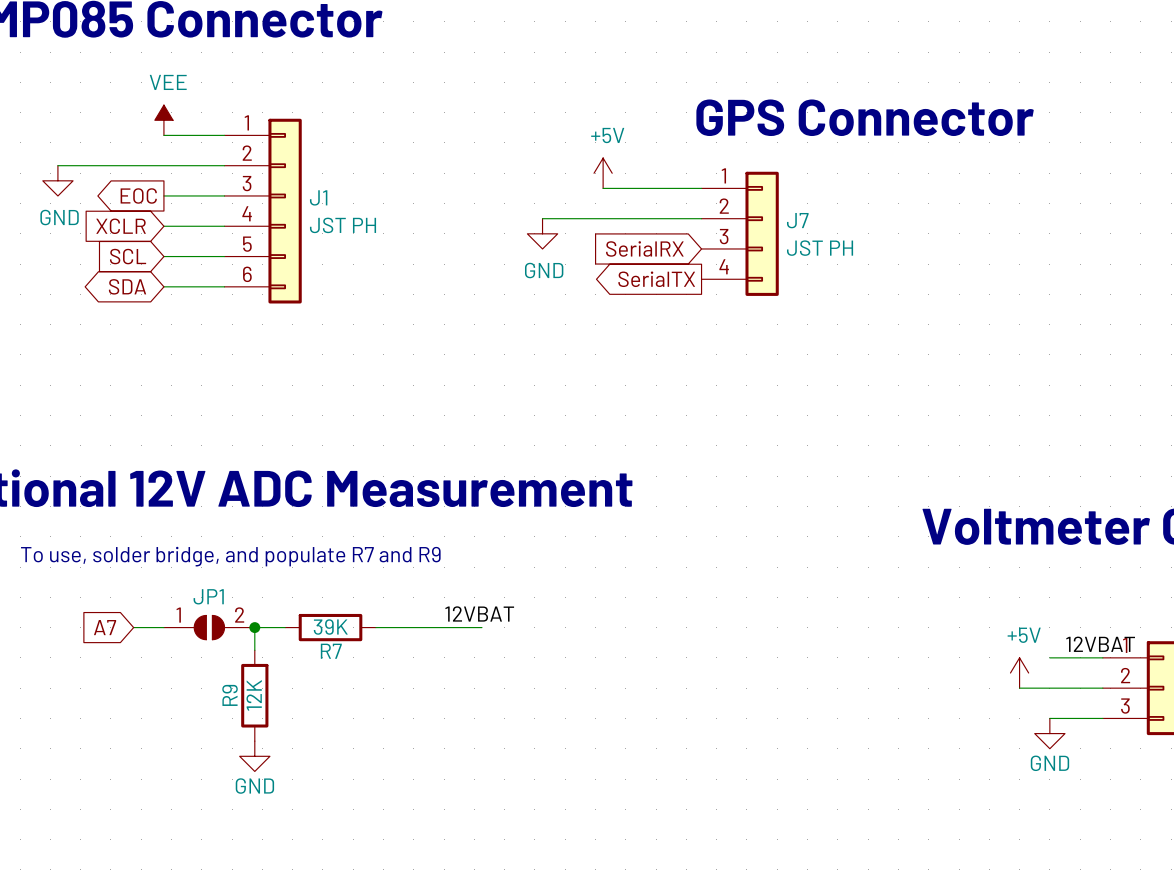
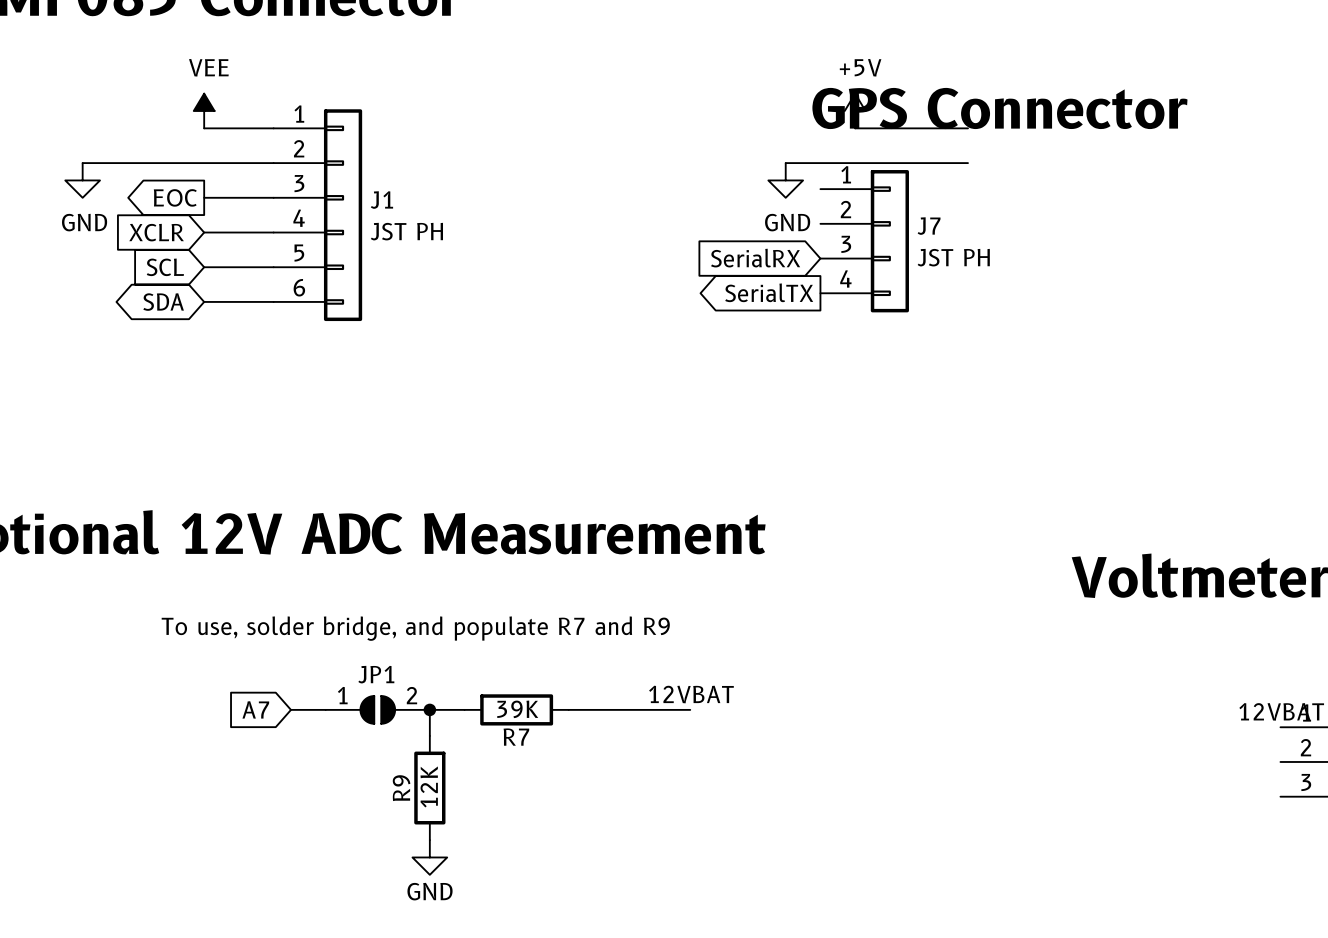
power symbol position: +5V (603, 173) -> +5V (855, 111)
wire: (603, 188) (701, 188) -> (855, 128) (968, 128)
wire: (542, 218) (701, 218) -> (785, 163) (968, 163)
power symbol position: GND (542, 233) -> GND (785, 180)
text position: To use, solder bridge, and populate R7 and R9 (230, 556) -> To use, solder bridge, and populate R7 and R9 (415, 628)
label position: 12VBAT (479, 613) -> 12VBAT (691, 694)
global label position: A7 (105, 627) -> A7 (255, 709)
wire: (133, 627) (163, 627) -> (290, 709) (325, 709)
JP1 position: (209, 627) -> (377, 709)
junction: (254, 627) -> none
wire: (285, 627) (254, 627) (254, 650) -> (464, 709) (429, 709) (429, 735)
R7 position: (330, 627) -> (516, 709)
wire: (375, 627) (481, 627) -> (568, 709) (690, 709)
junction: none -> (429, 709)
wire: (1049, 657) (1102, 657) -> none
power symbol: +5V (1019, 673) -> none
wire: (1019, 688) (1102, 688) -> none
R9 position: (254, 695) -> (429, 788)
wire: (1049, 718) (1102, 718) -> none
power symbol: GND (1049, 733) -> none
power symbol position: GND (254, 756) -> GND (429, 857)

